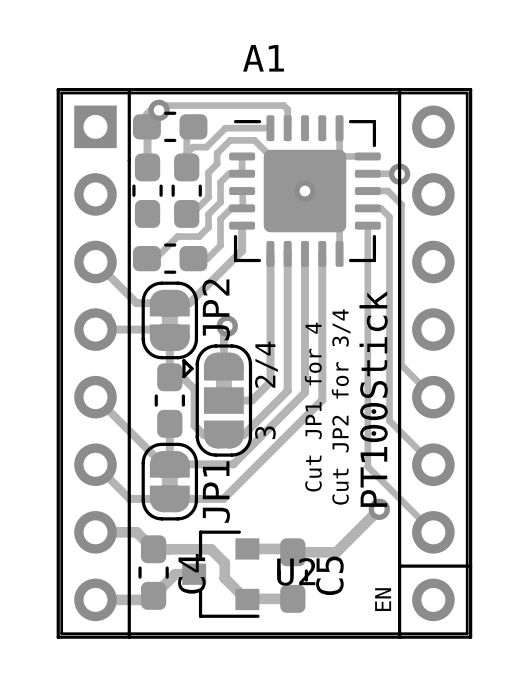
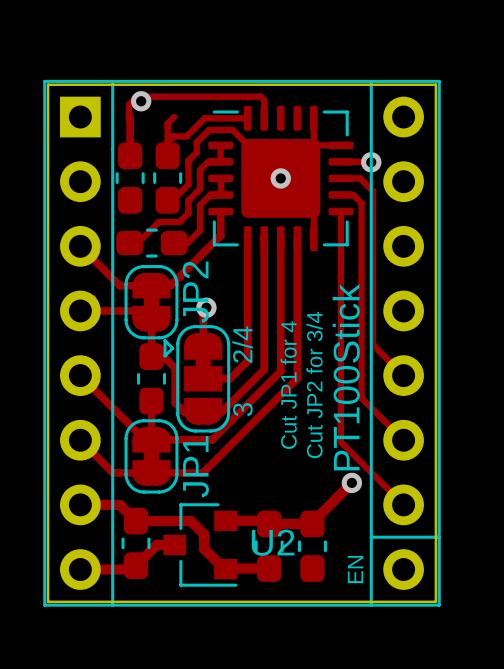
A1 name: A1 (263, 58) -> none
part rotation: 0° (170, 126) -> 90° clockwise (312, 546)
part position: (170, 126) -> (312, 546)
C4 name: C4 (191, 573) -> none
C5 name: C5 (329, 575) -> none

